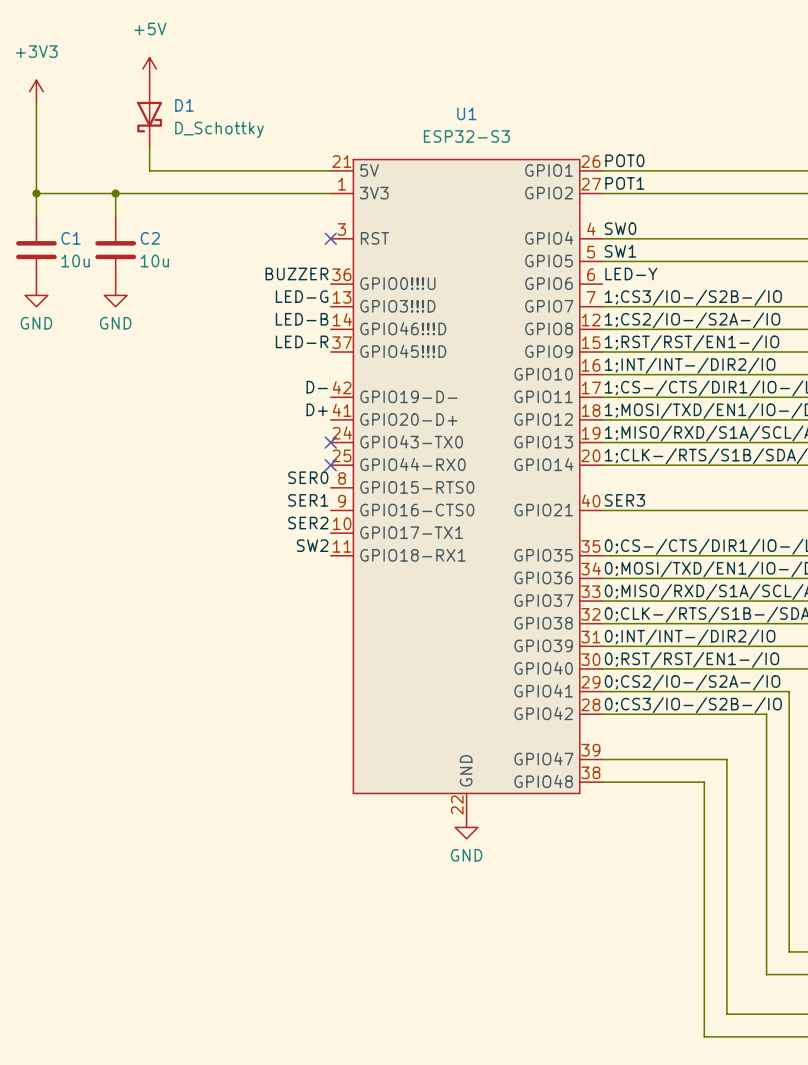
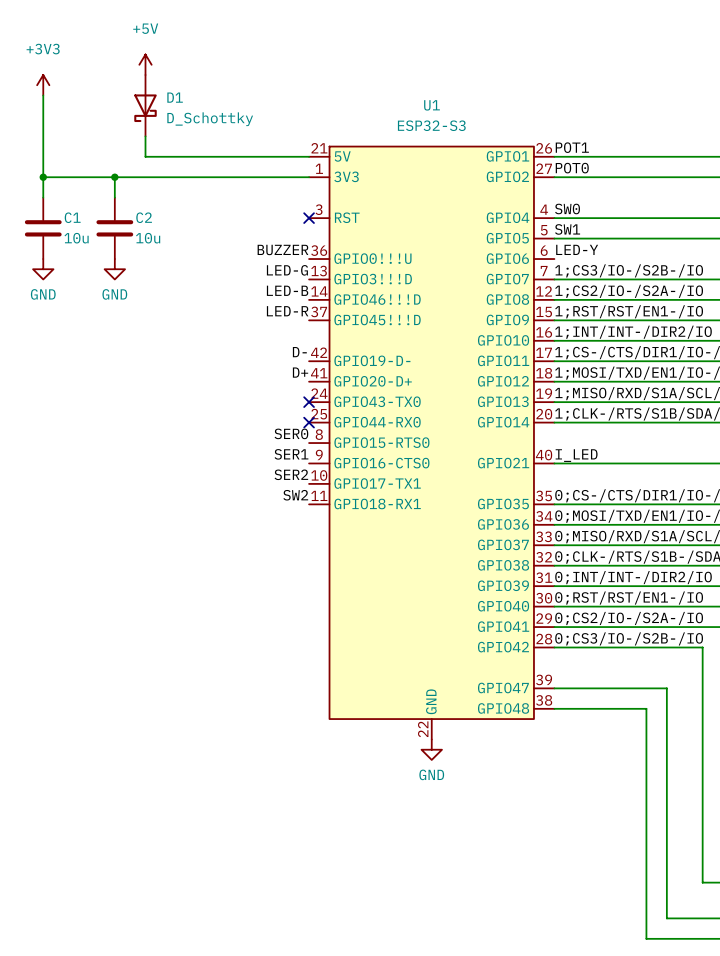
label: POT0 (624, 160) -> POT1 (572, 147)
label: POT1 (624, 183) -> POT0 (572, 168)
label: SER3 (624, 500) -> I_LED (576, 455)

